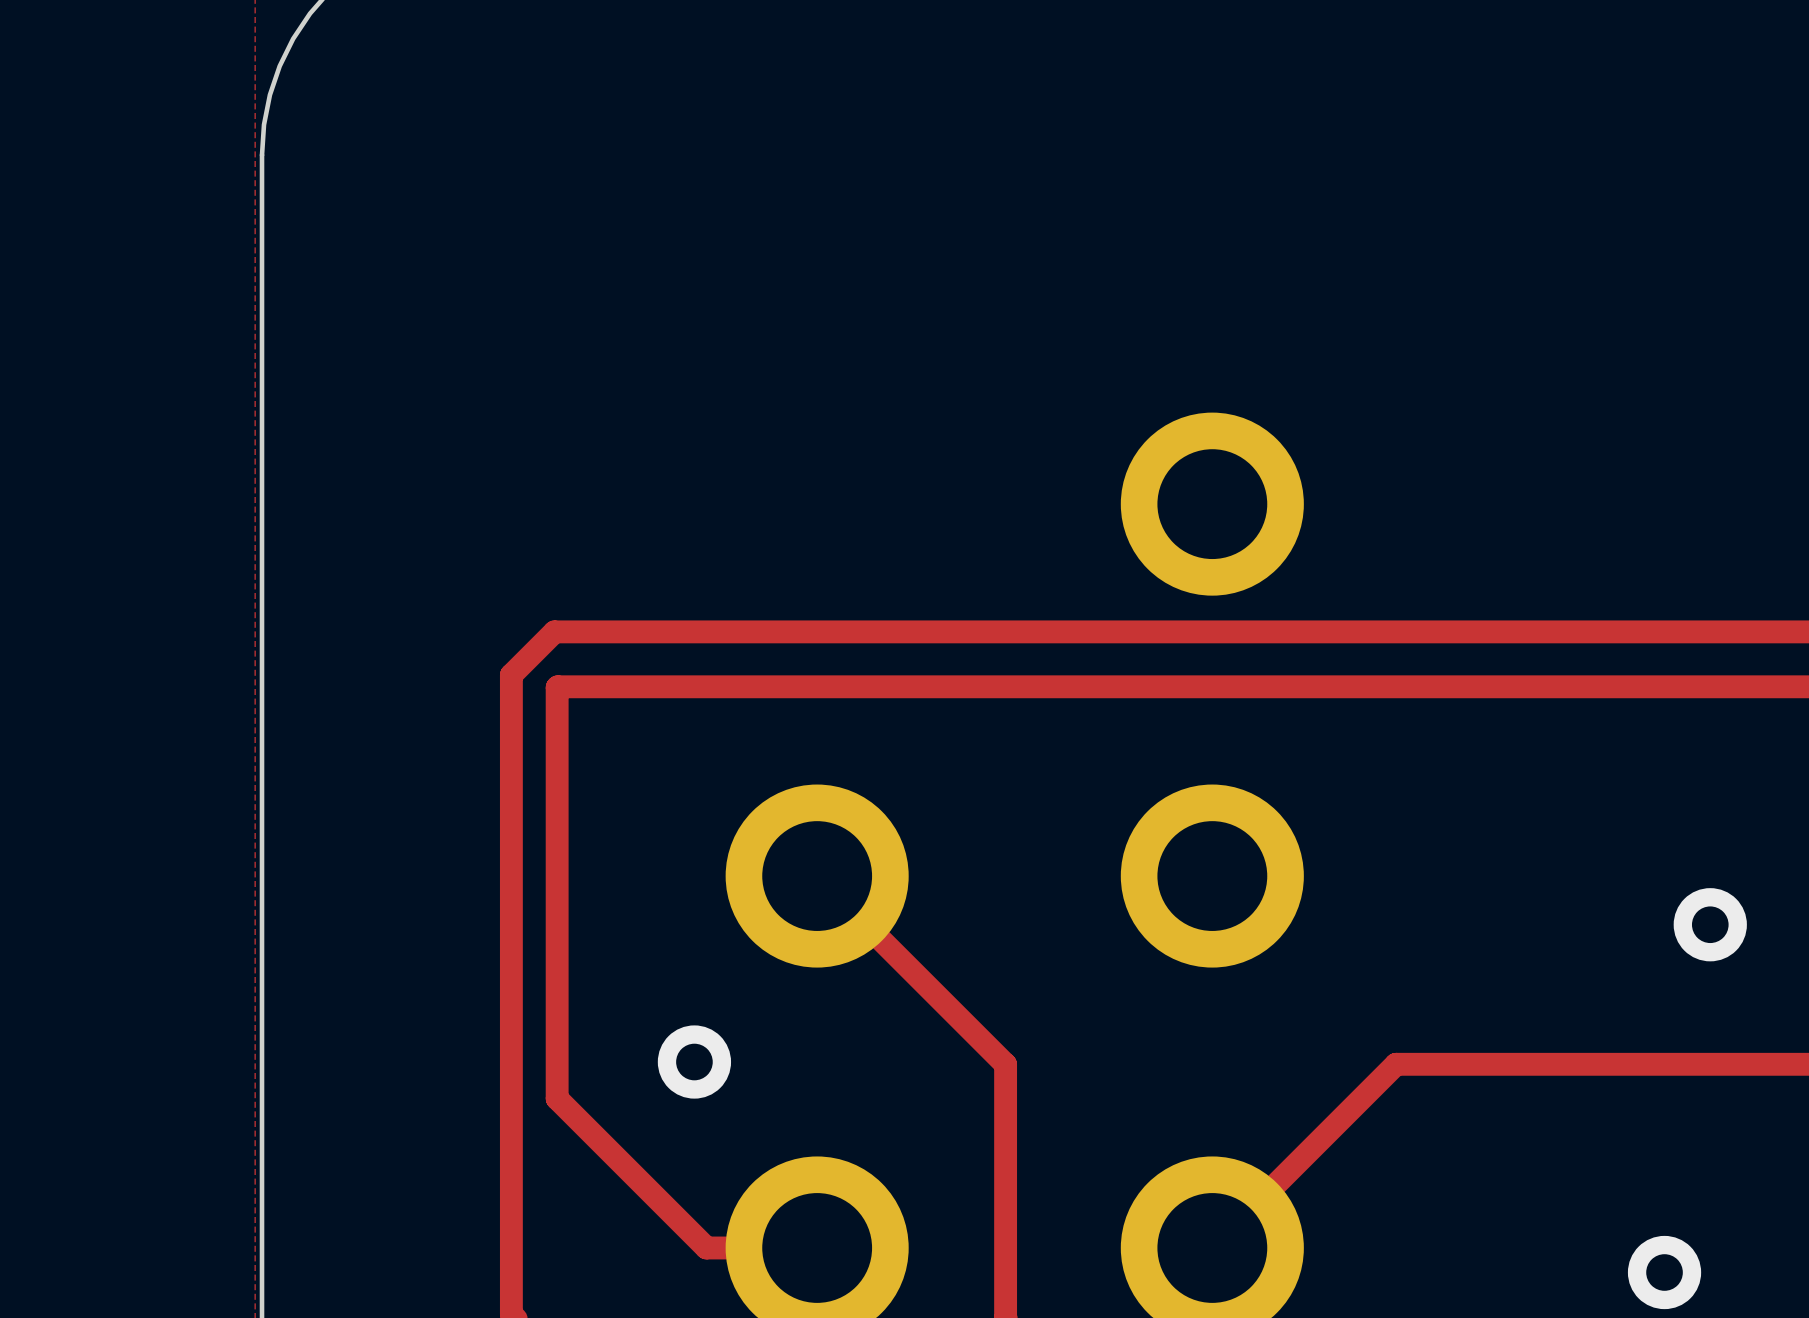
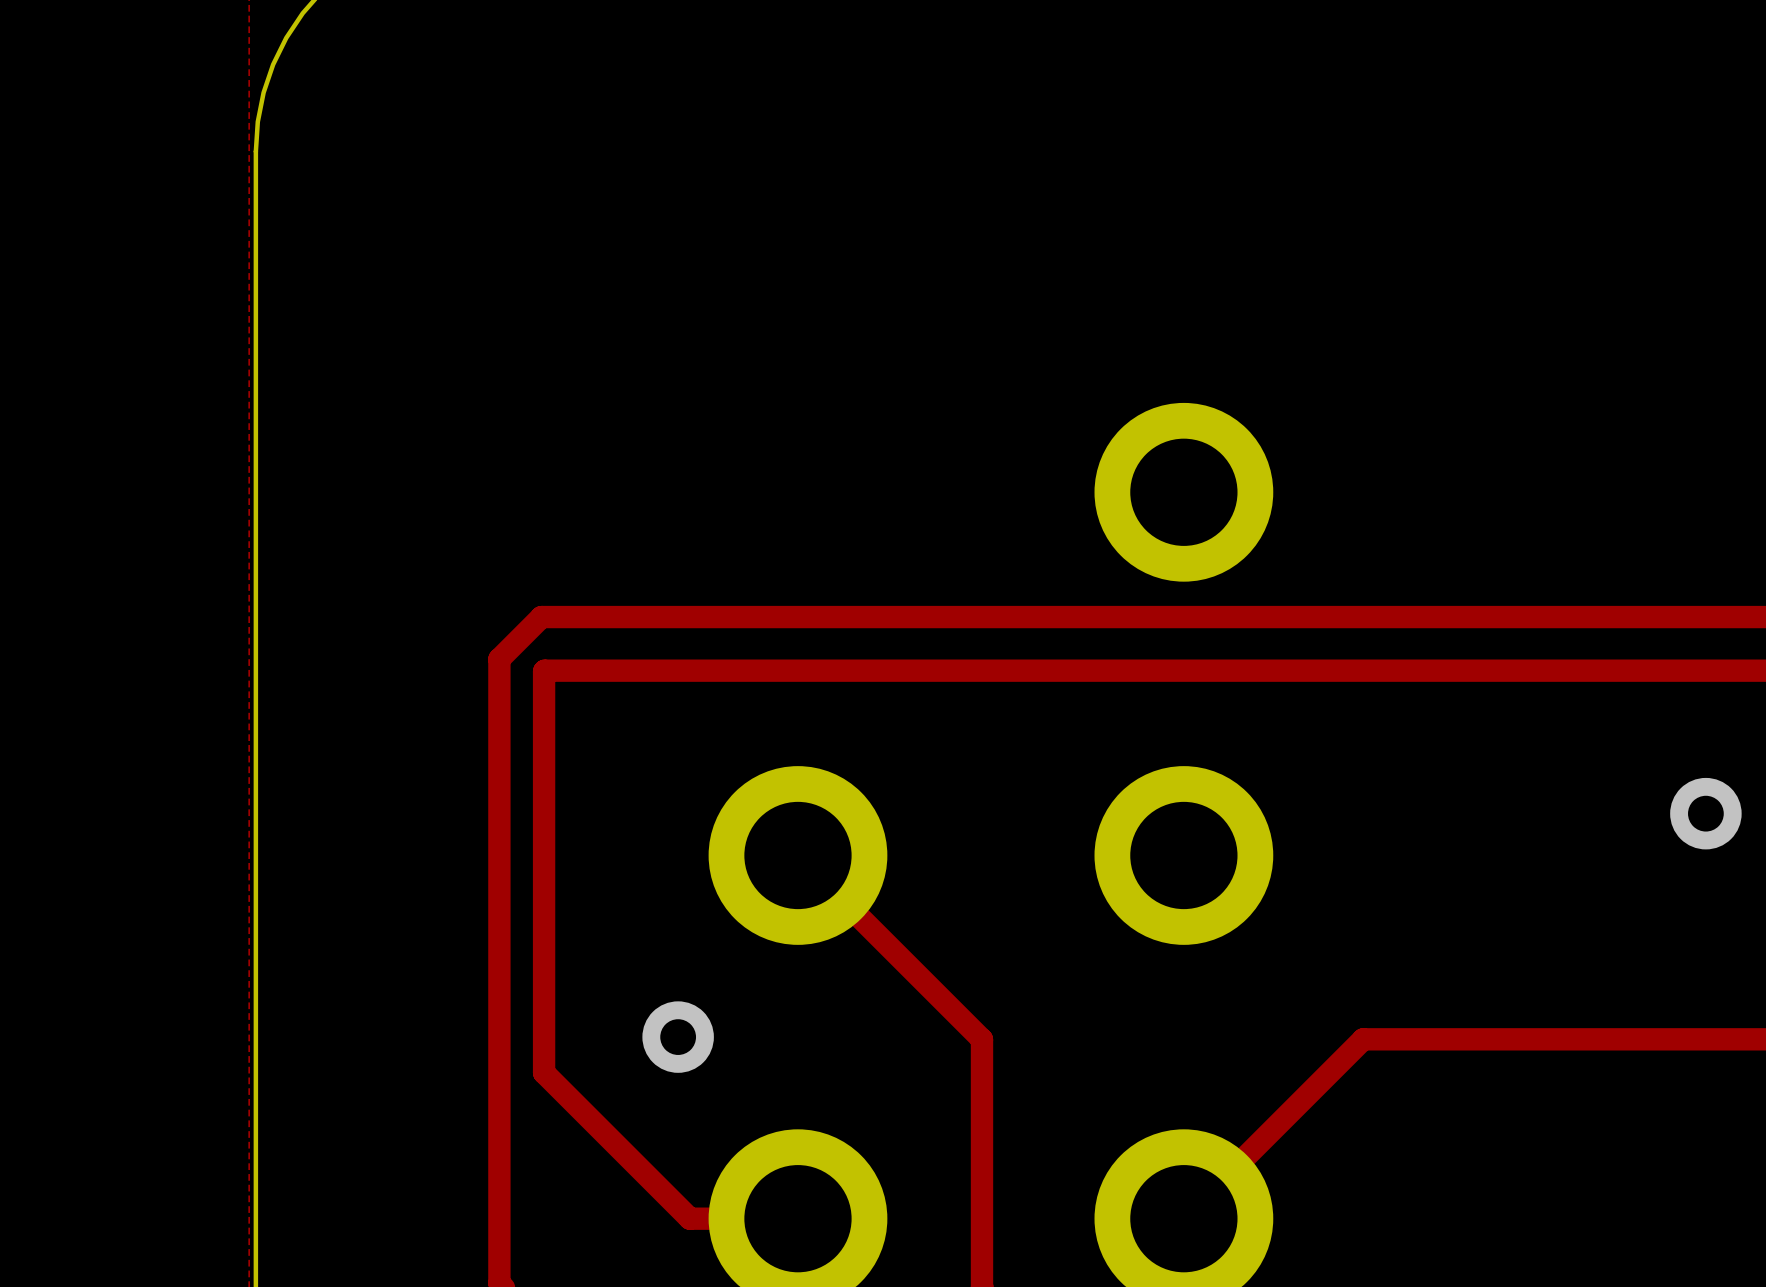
via position: (1710, 924) -> (1705, 813)
via: (1664, 1272) -> none

